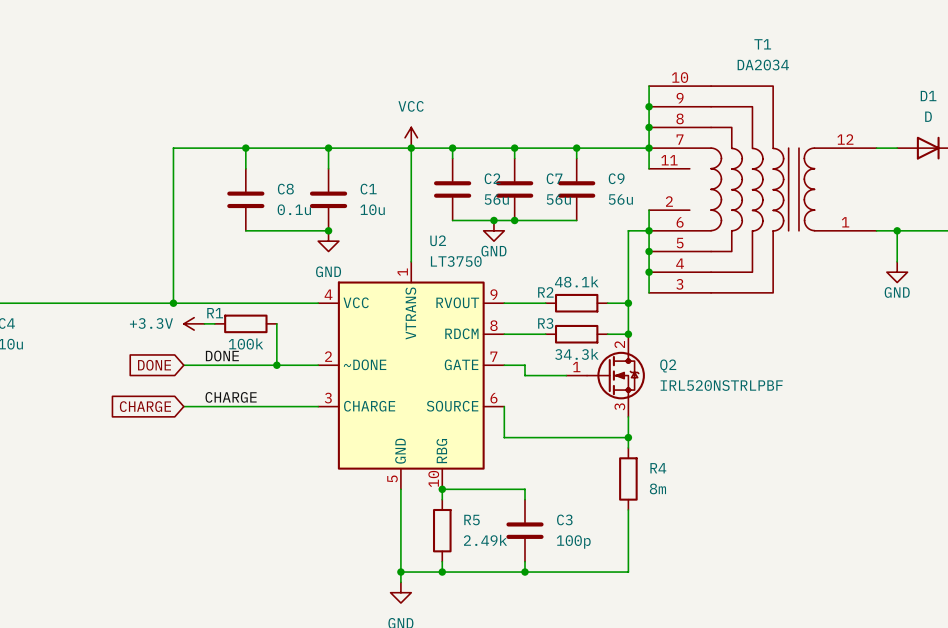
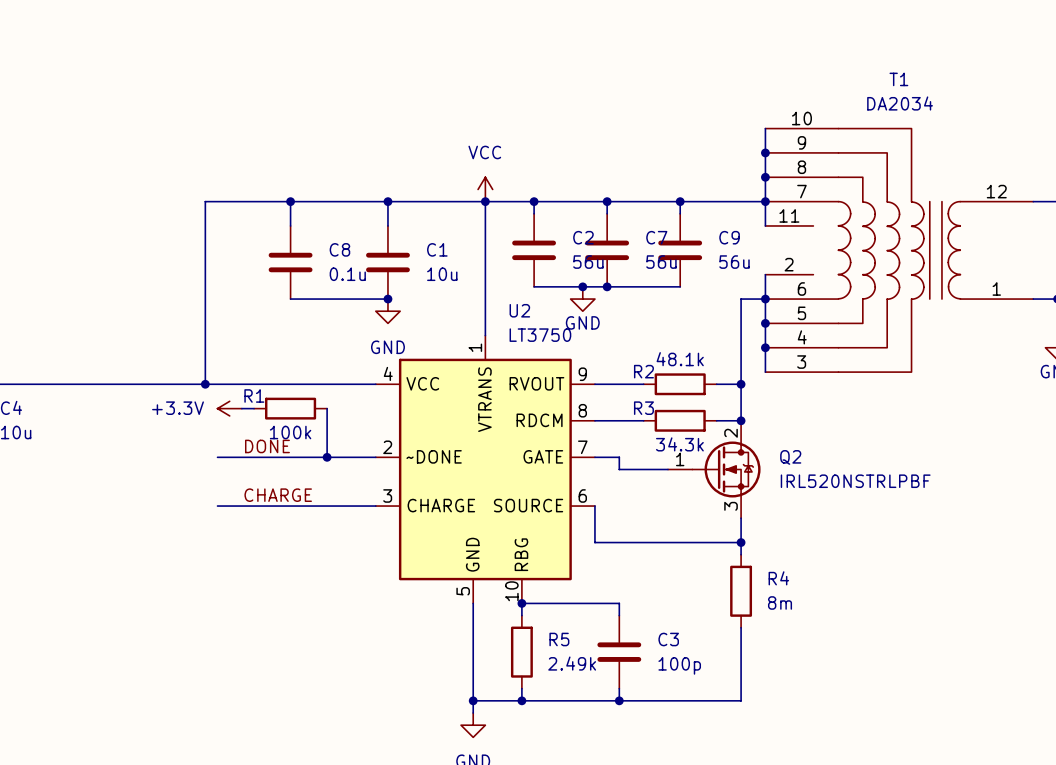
global label: DONE (154, 365) -> none
global label: CHARGE (145, 406) -> none

